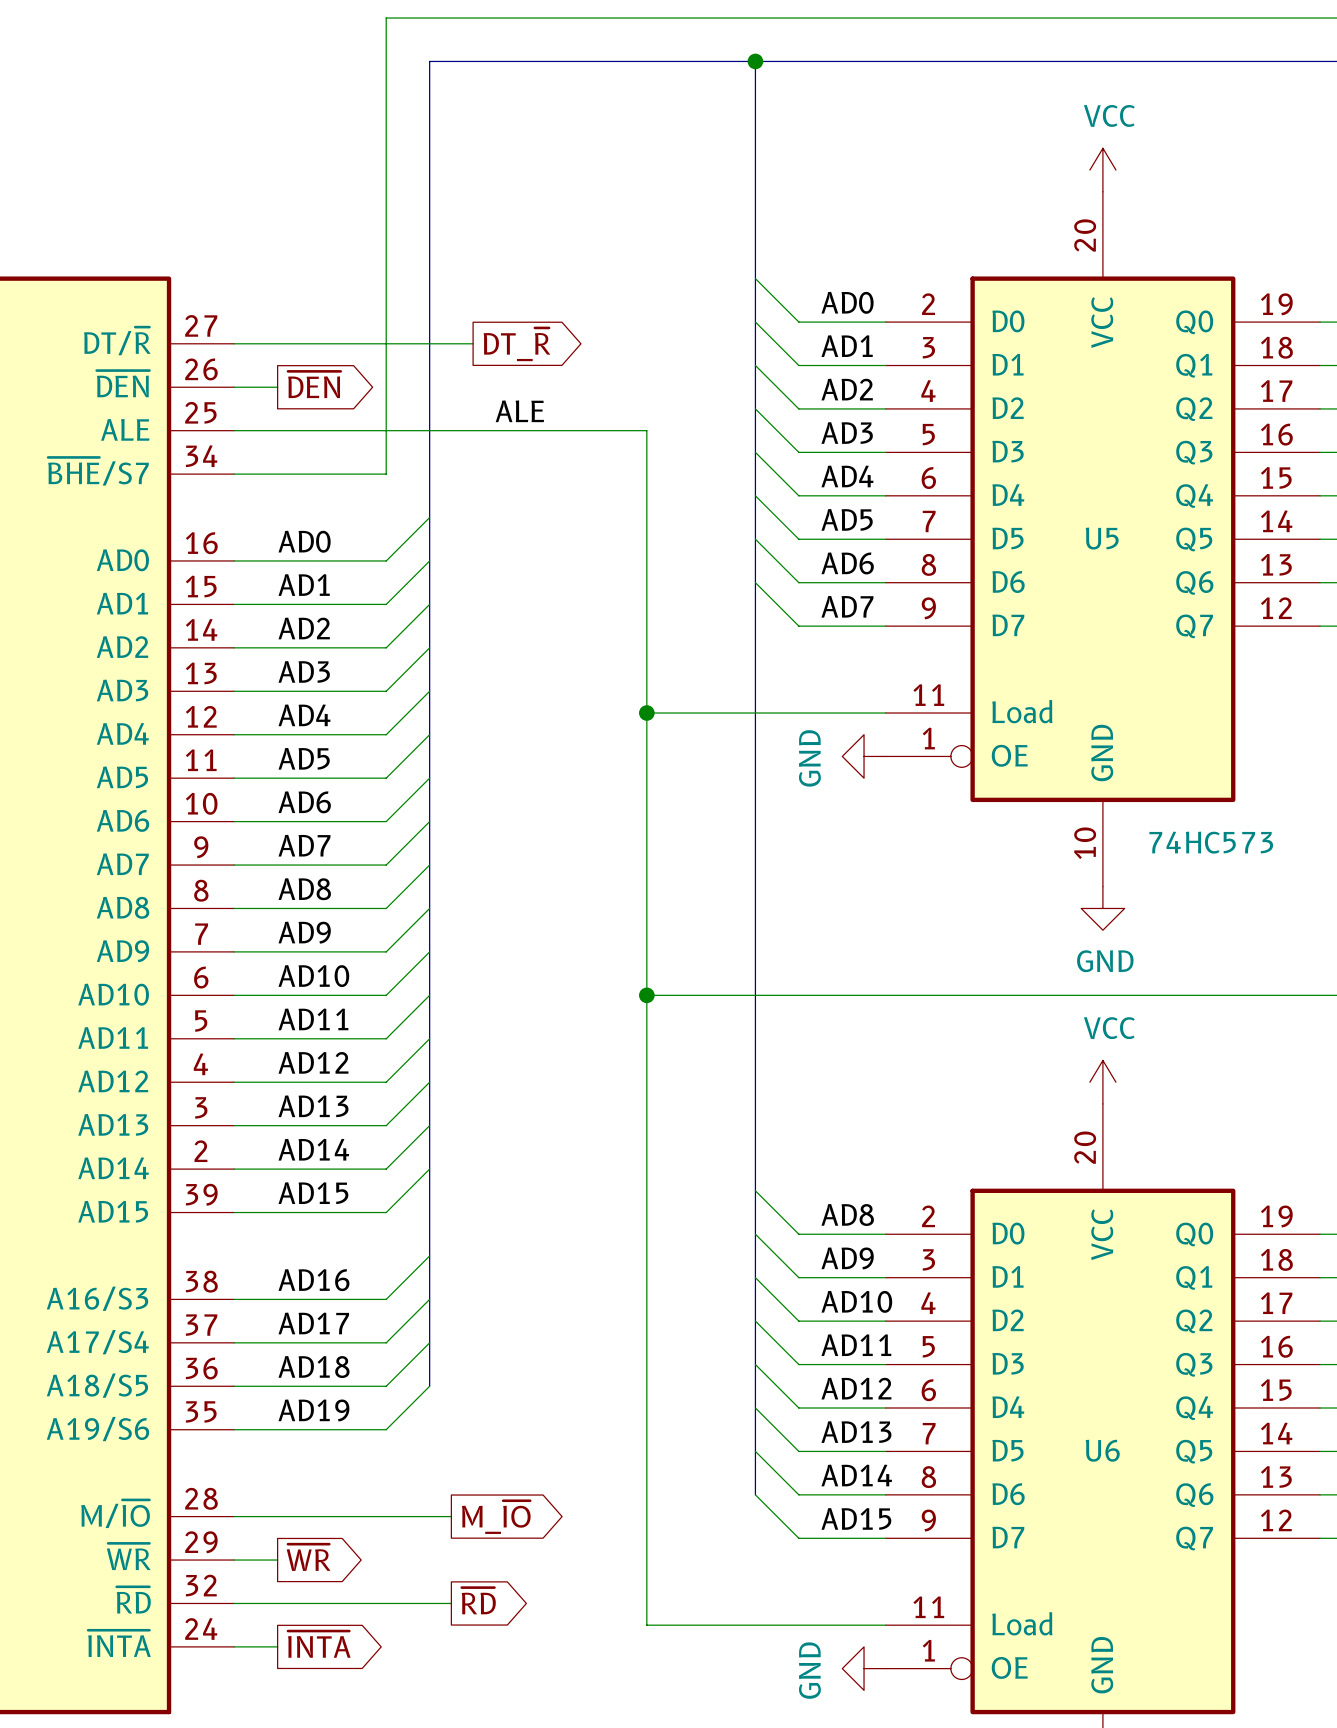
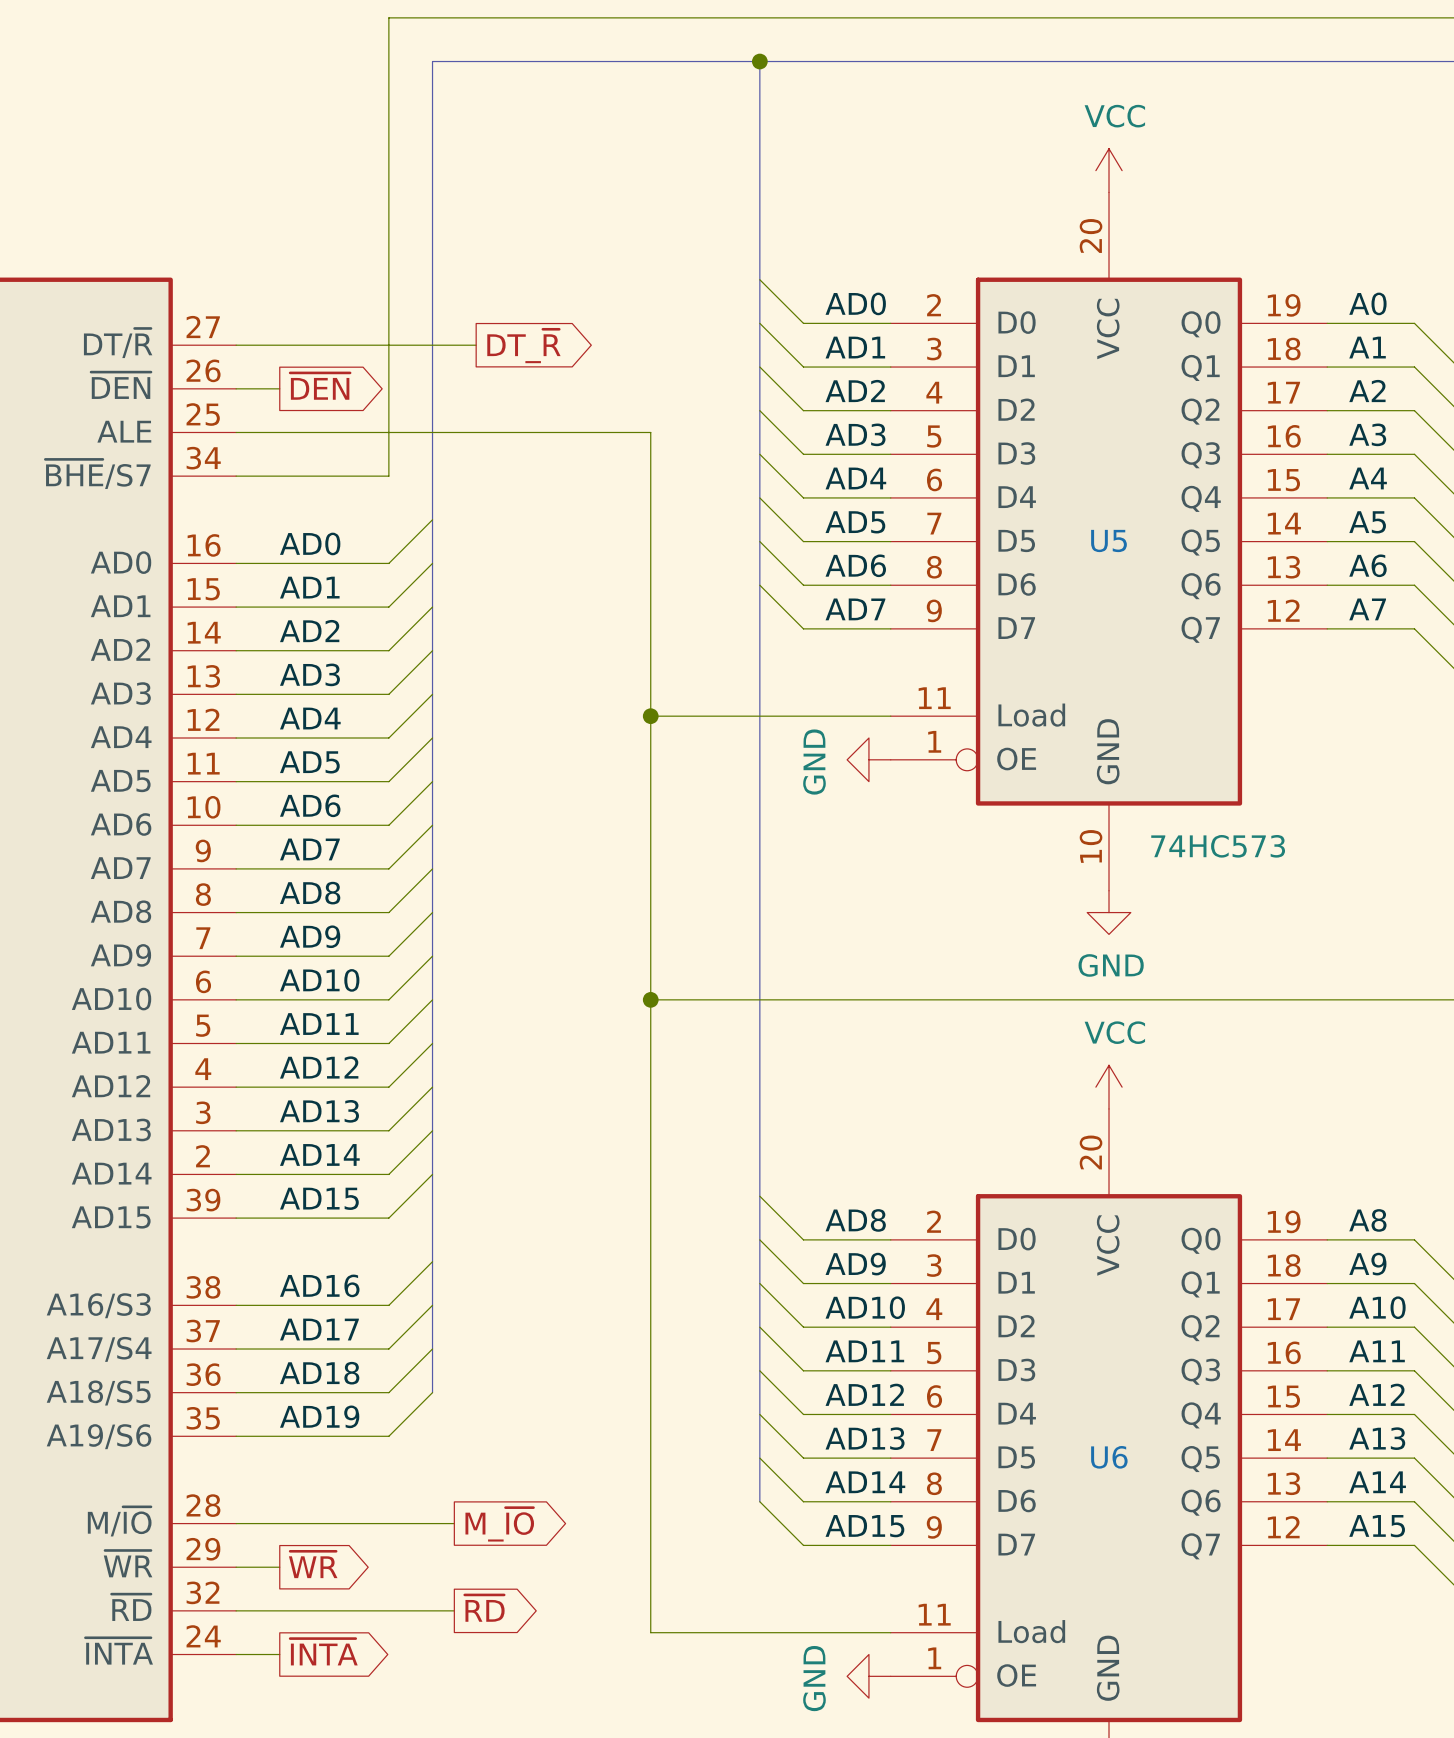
label: ALE (519, 411) -> none

